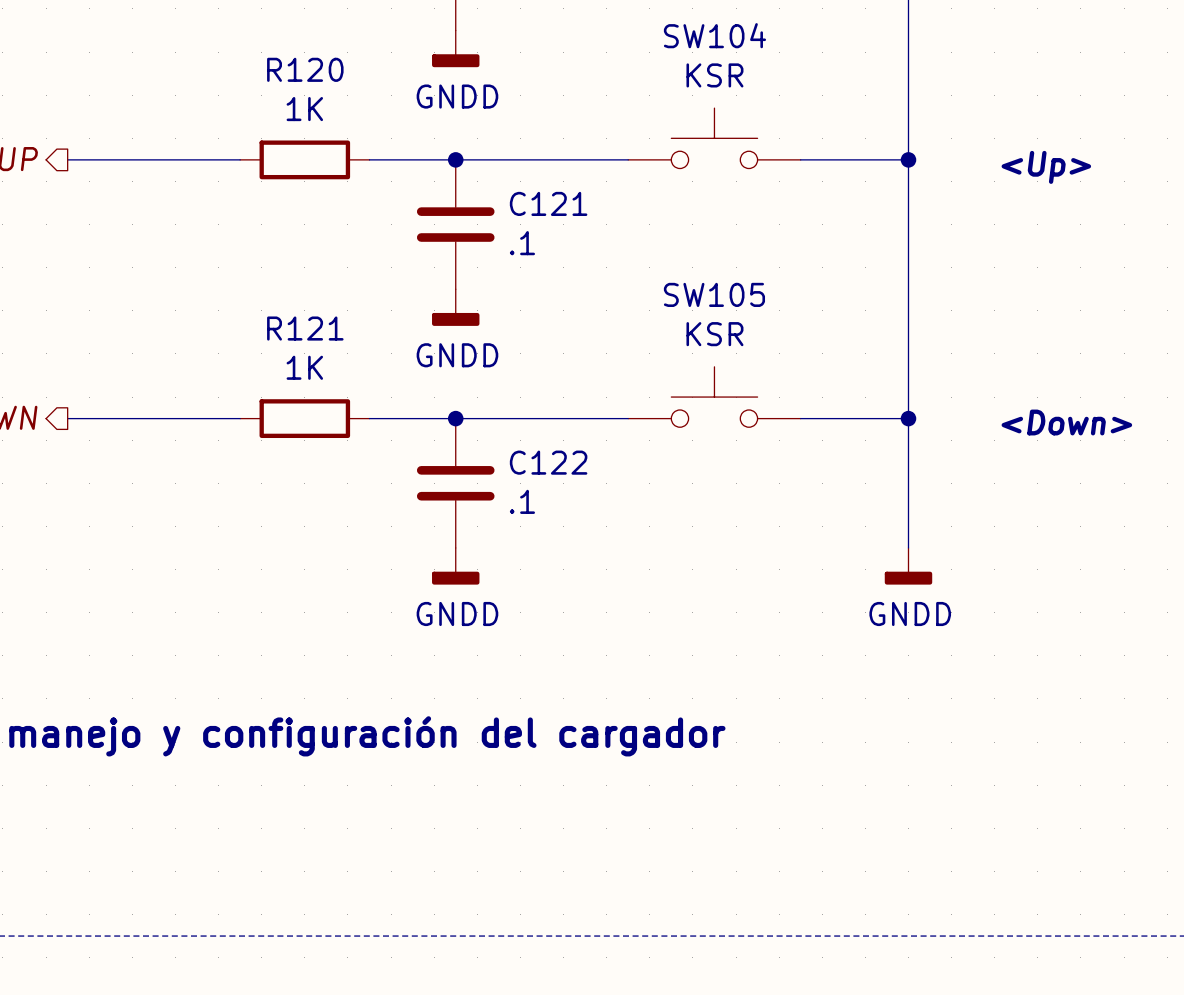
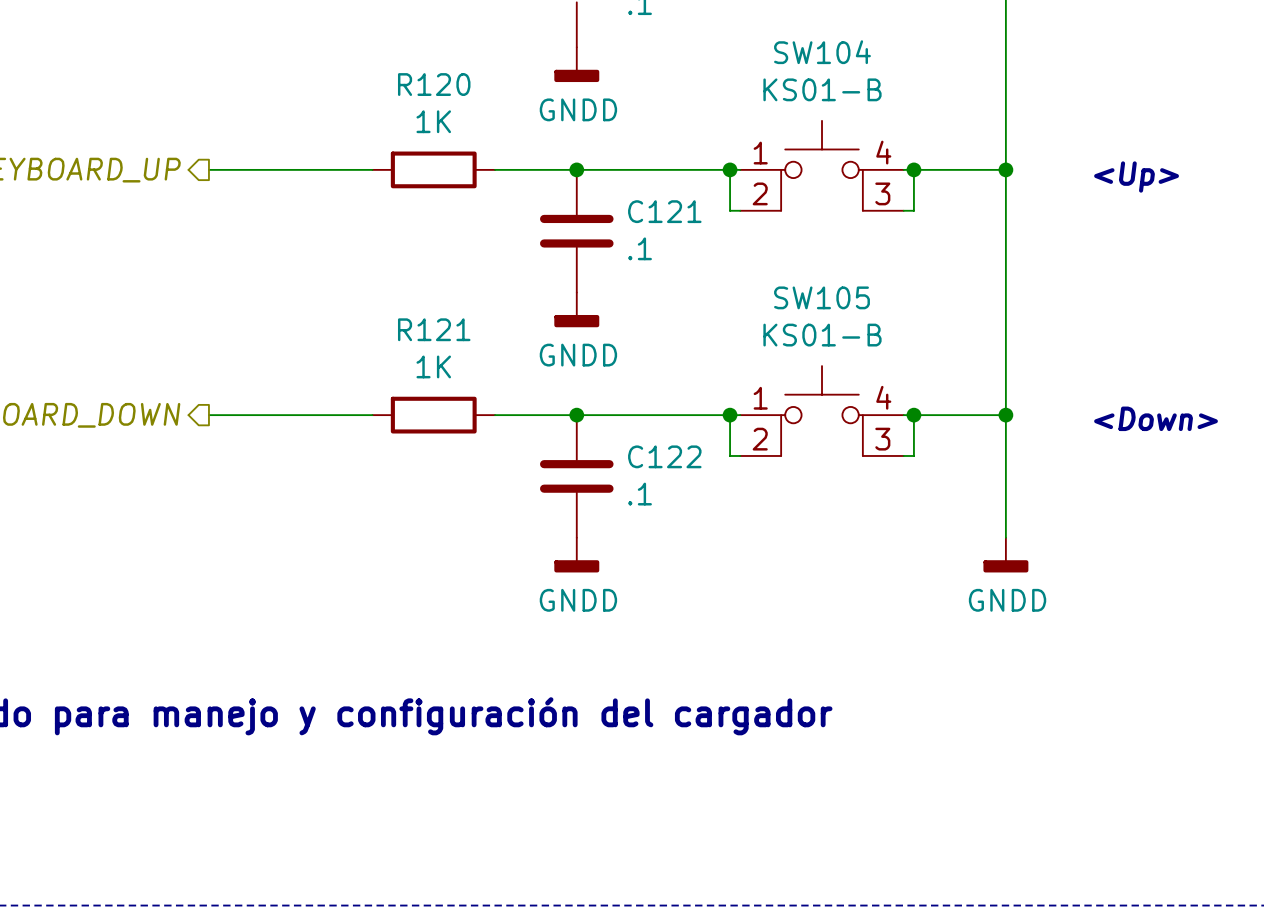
SW104 value: KSR (714, 75) -> KS01-B (822, 89)
SW104 symbol: [628, 108, 801, 169] -> [740, 120, 904, 211]
wire: none -> (730, 169) (730, 210) (740, 210)
junction: none -> (730, 169)
wire: none -> (913, 169) (913, 210) (903, 210)
junction: none -> (913, 169)
SW105 value: KSR (714, 334) -> KS01-B (822, 335)
SW105 symbol: [628, 366, 801, 428] -> [740, 366, 904, 456]
wire: none -> (730, 415) (730, 455) (740, 455)
junction: none -> (730, 415)
wire: none -> (913, 415) (913, 455) (903, 455)
junction: none -> (913, 415)

